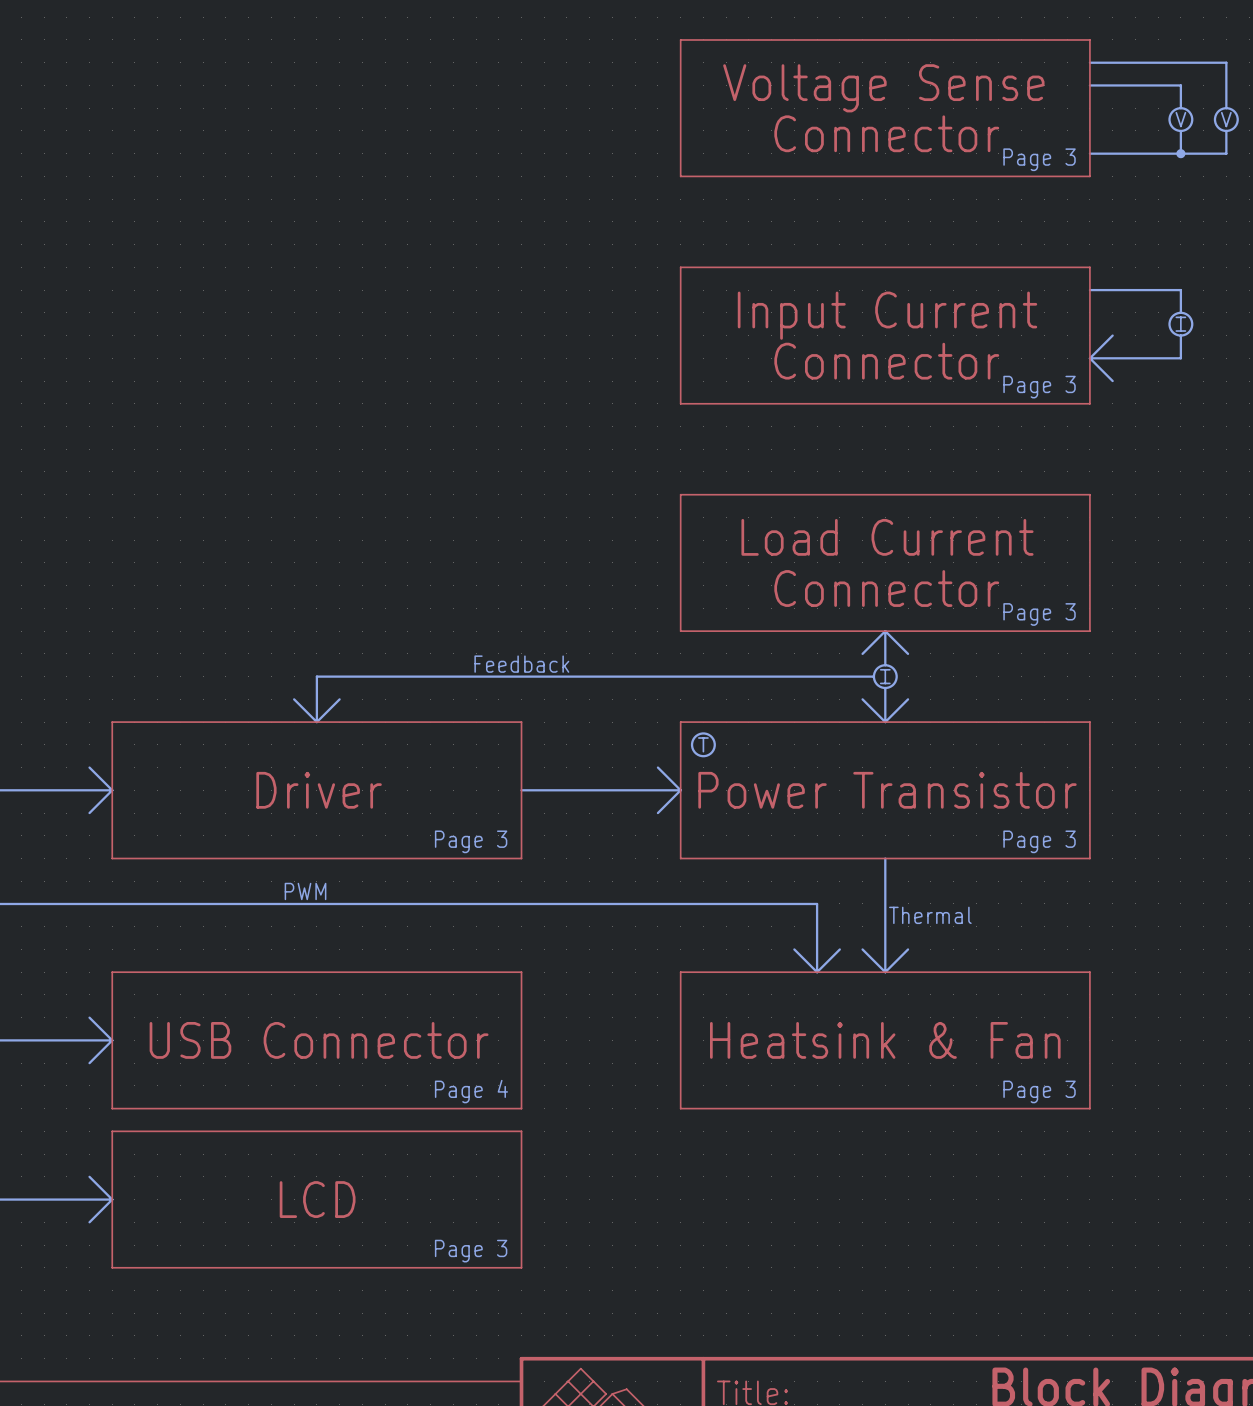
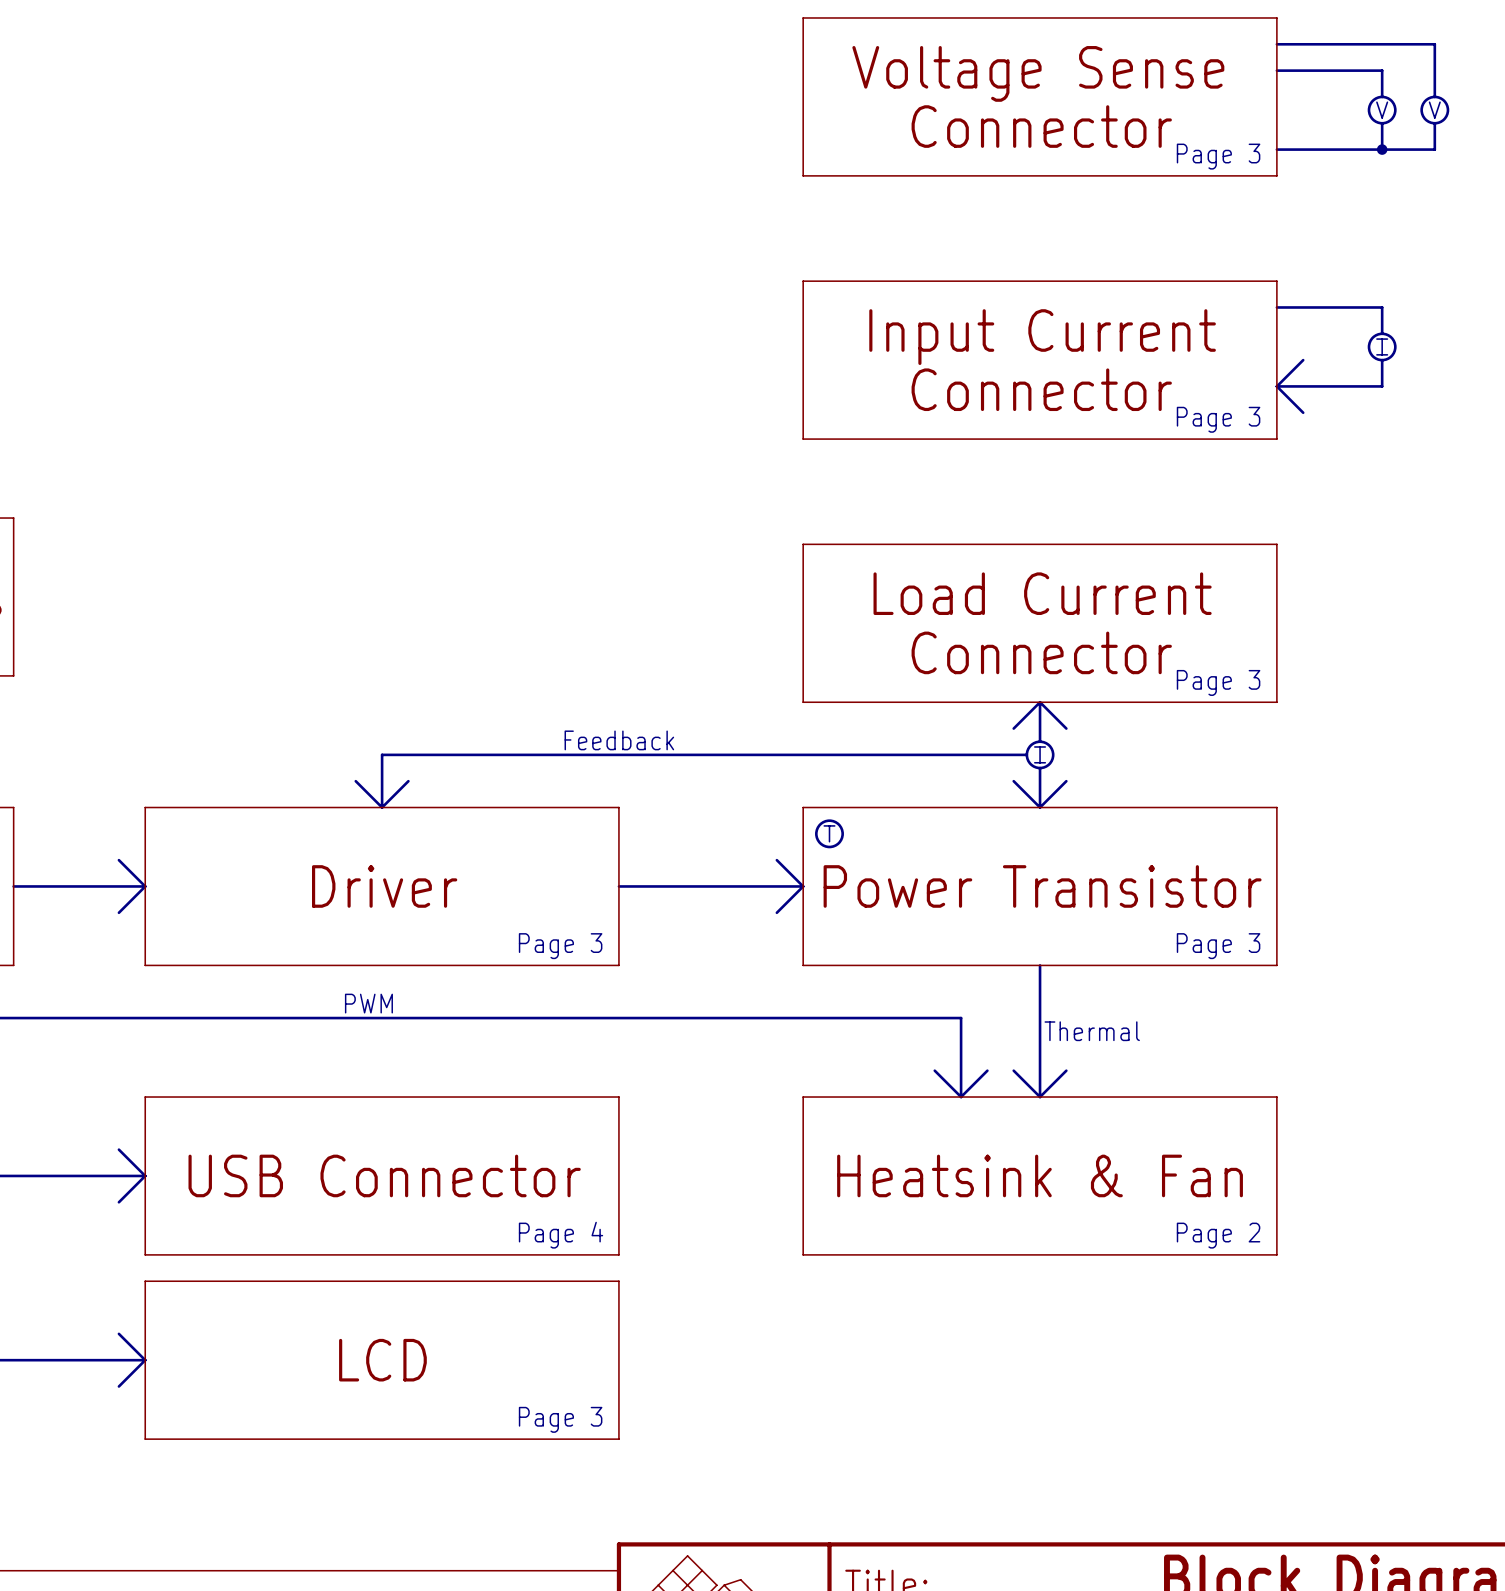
text: Page 3 (1039, 1091) -> Page 2 (1218, 1235)

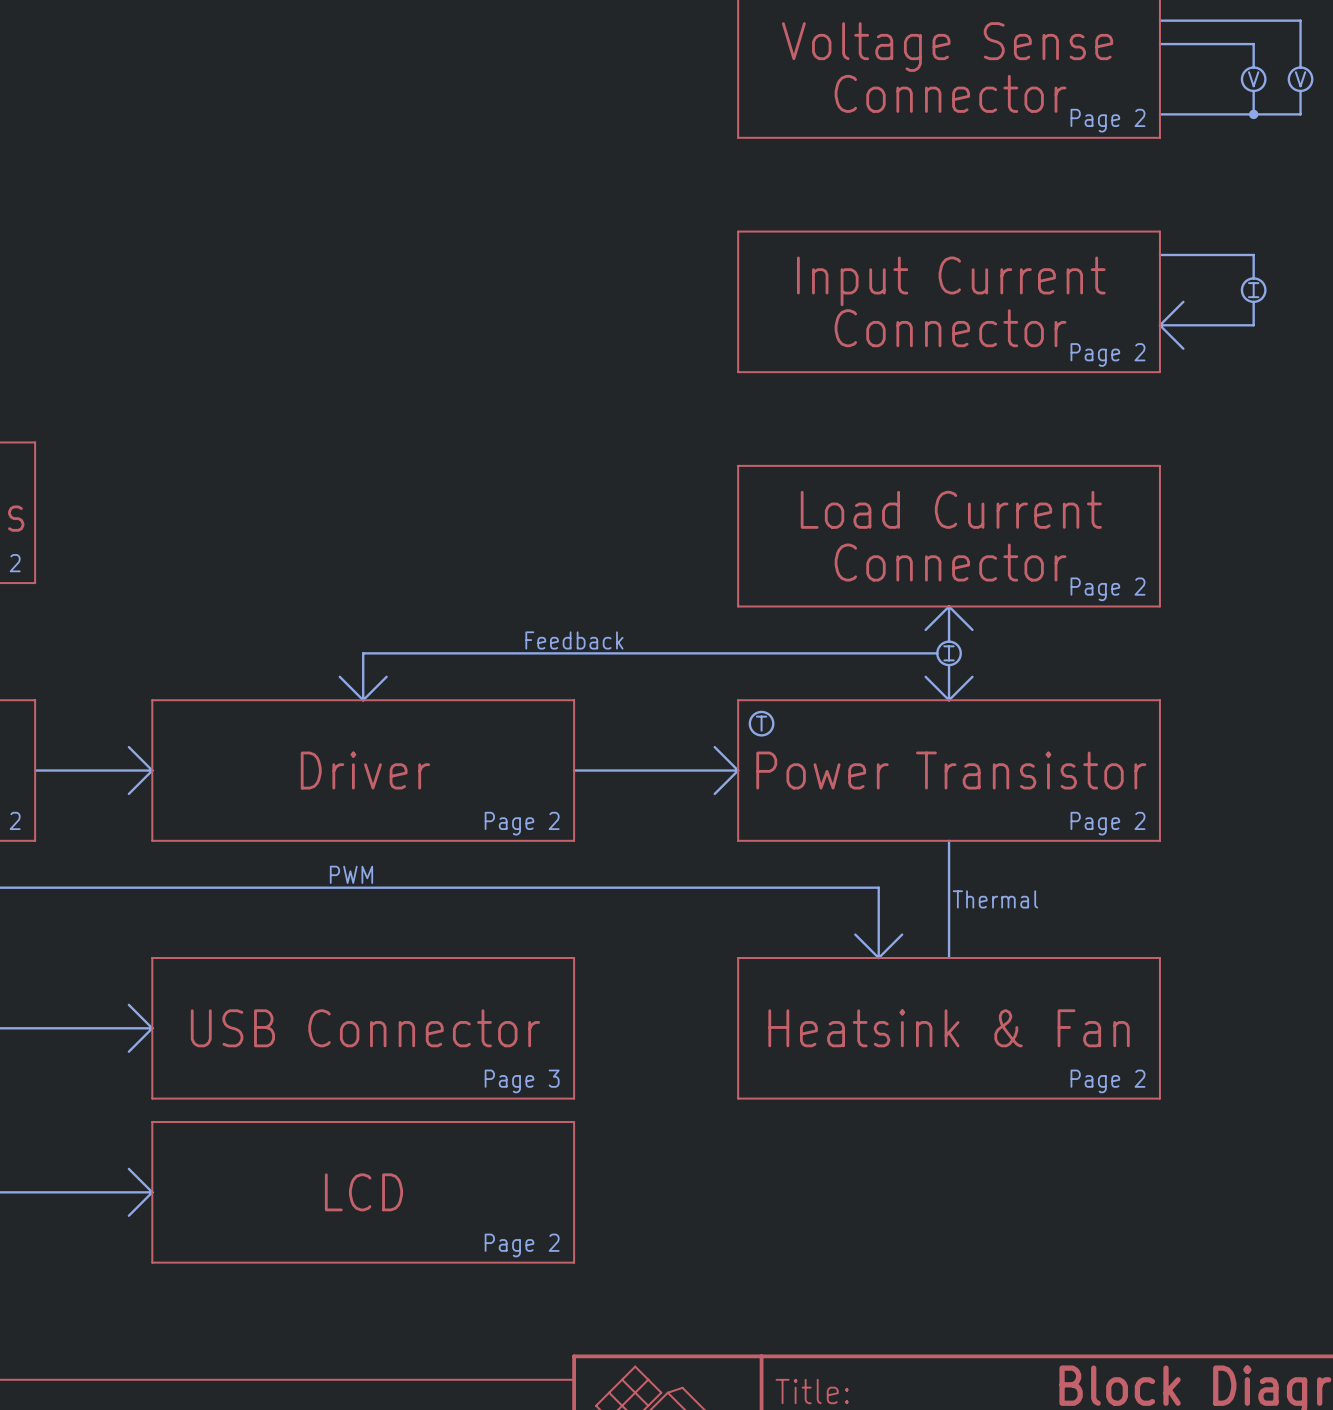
text: Page 3 (1218, 156) -> Page 2 (1107, 120)
text: Page 3 (1218, 419) -> Page 2 (1107, 354)
text: Page 3 (1218, 682) -> Page 2 (1107, 589)
text: Page 3 (560, 946) -> Page 2 (522, 823)
text: Page 3 (1218, 946) -> Page 2 (1107, 823)
line: (1013, 1070) (1040, 1097) (1066, 1070) -> none
text: Page 4 (561, 1235) -> Page 3 (522, 1081)
text: Page 3 (560, 1419) -> Page 2 (522, 1245)

